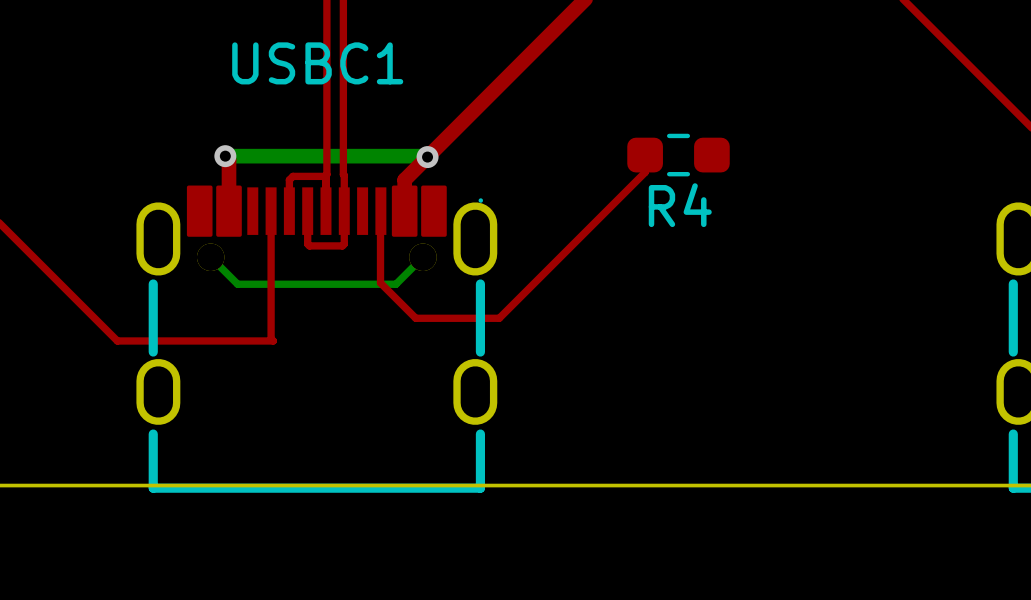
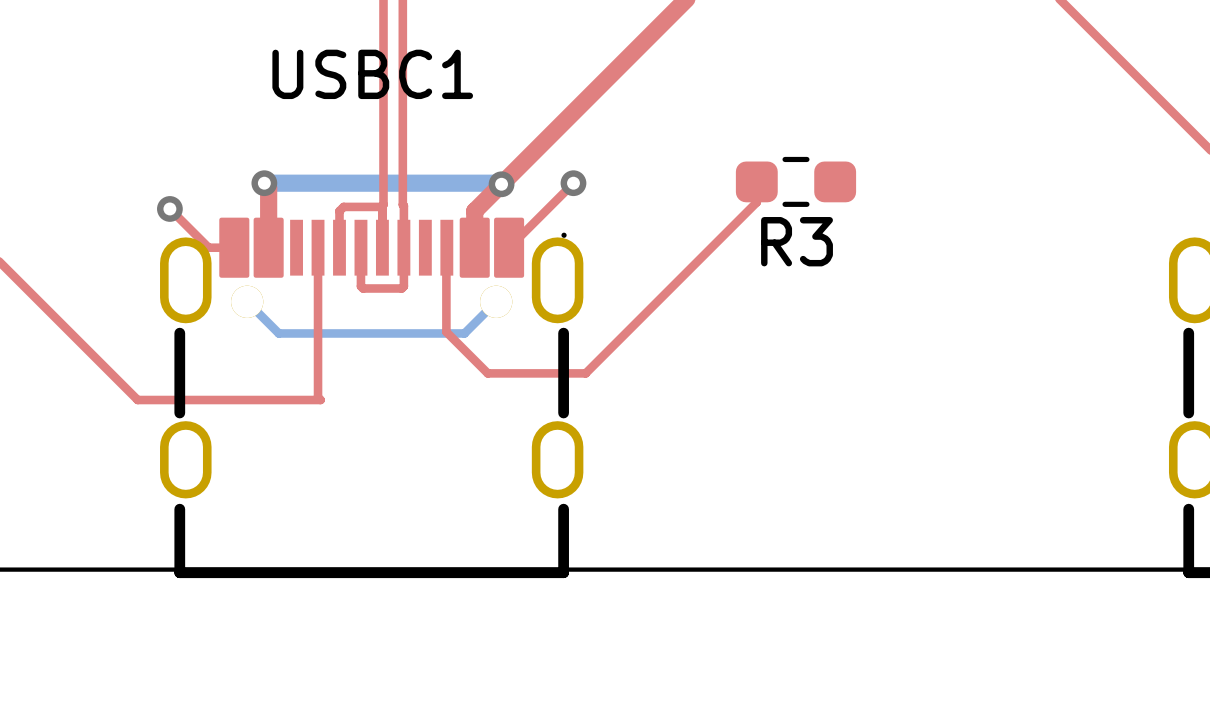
top track: none -> (573, 183) (509, 247)
via: none -> (573, 183)
top track: none -> (169, 208) (208, 247) (234, 247)
via: none -> (169, 208)
R4 name: R4 (680, 205) -> R3 (797, 241)

